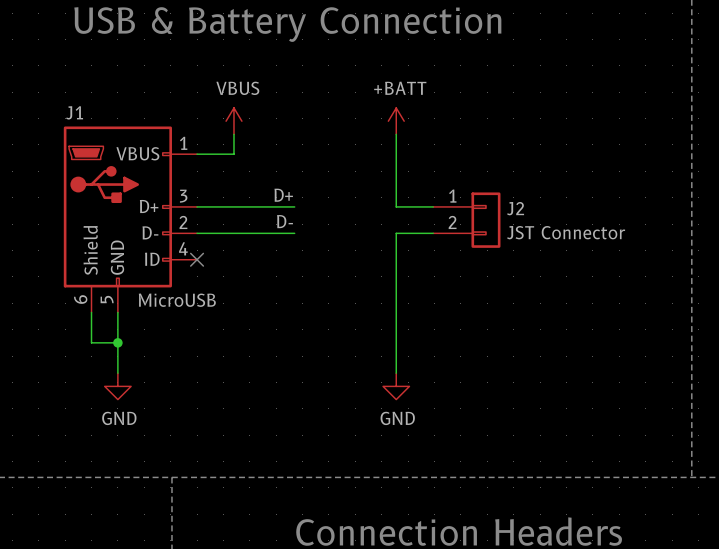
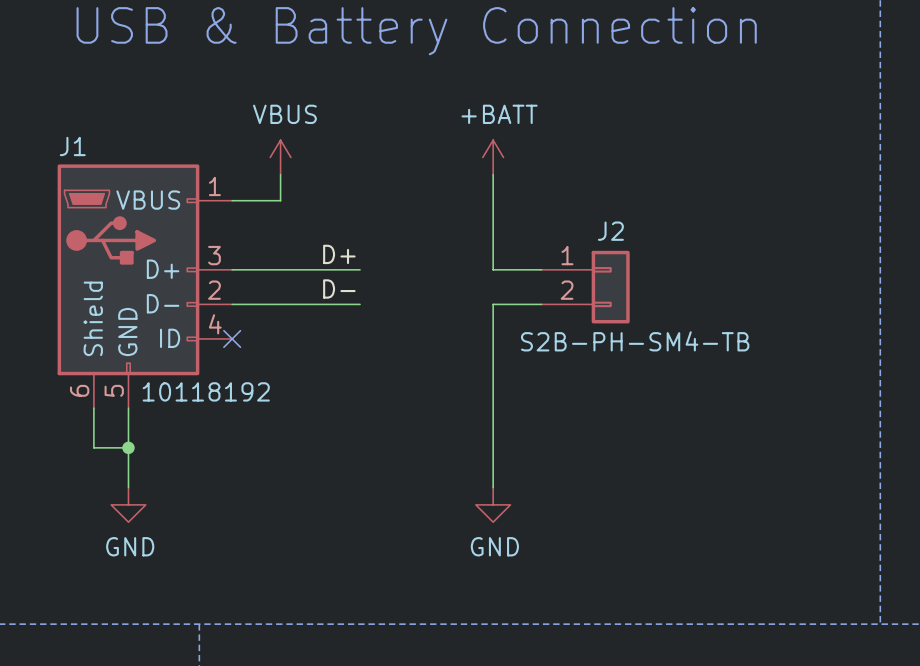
J2 name position: J2 (515, 208) -> J2 (610, 231)
J2 value: JST Connector (566, 232) -> S2B-PH-SM4-TB (635, 341)
J1 value: MicroUSB (177, 300) -> 10118192 (206, 391)

